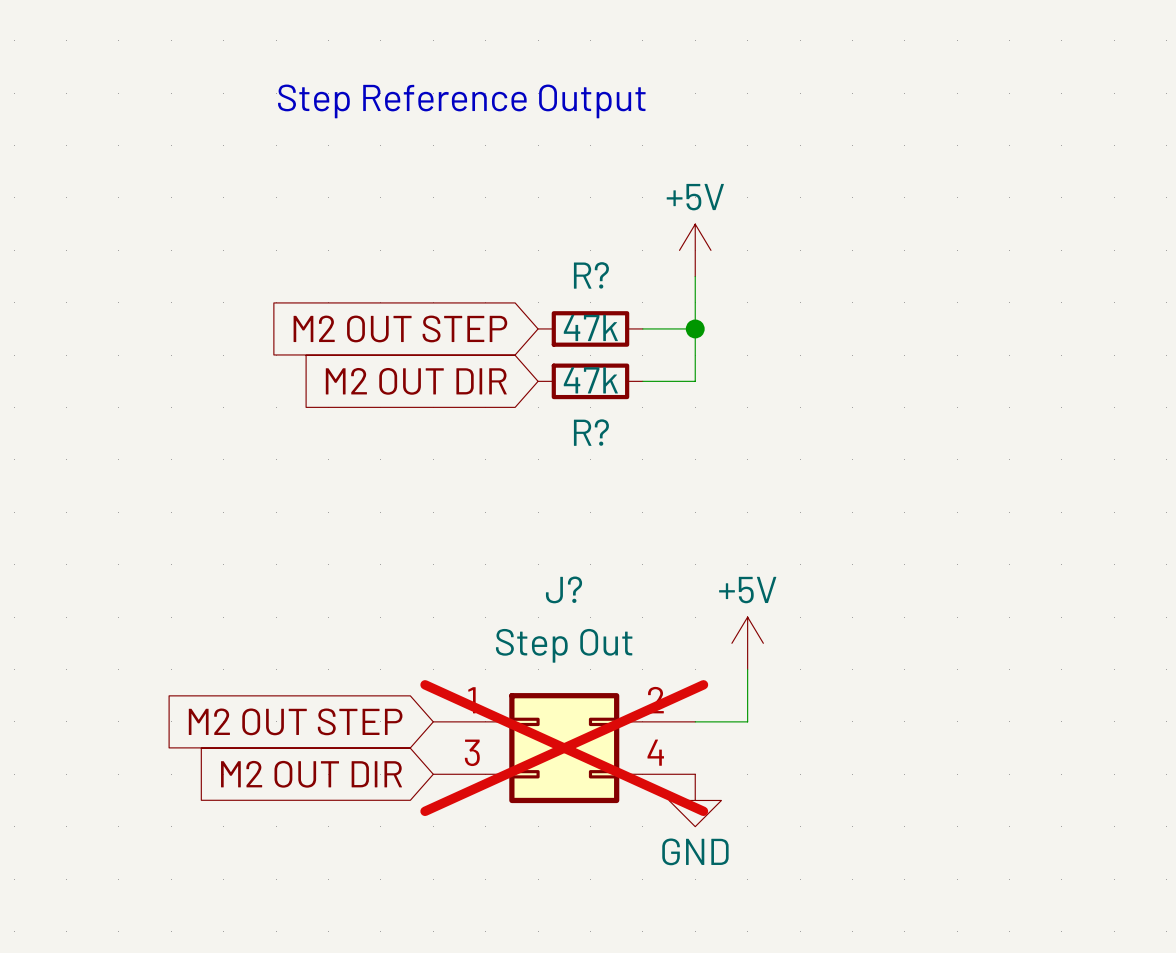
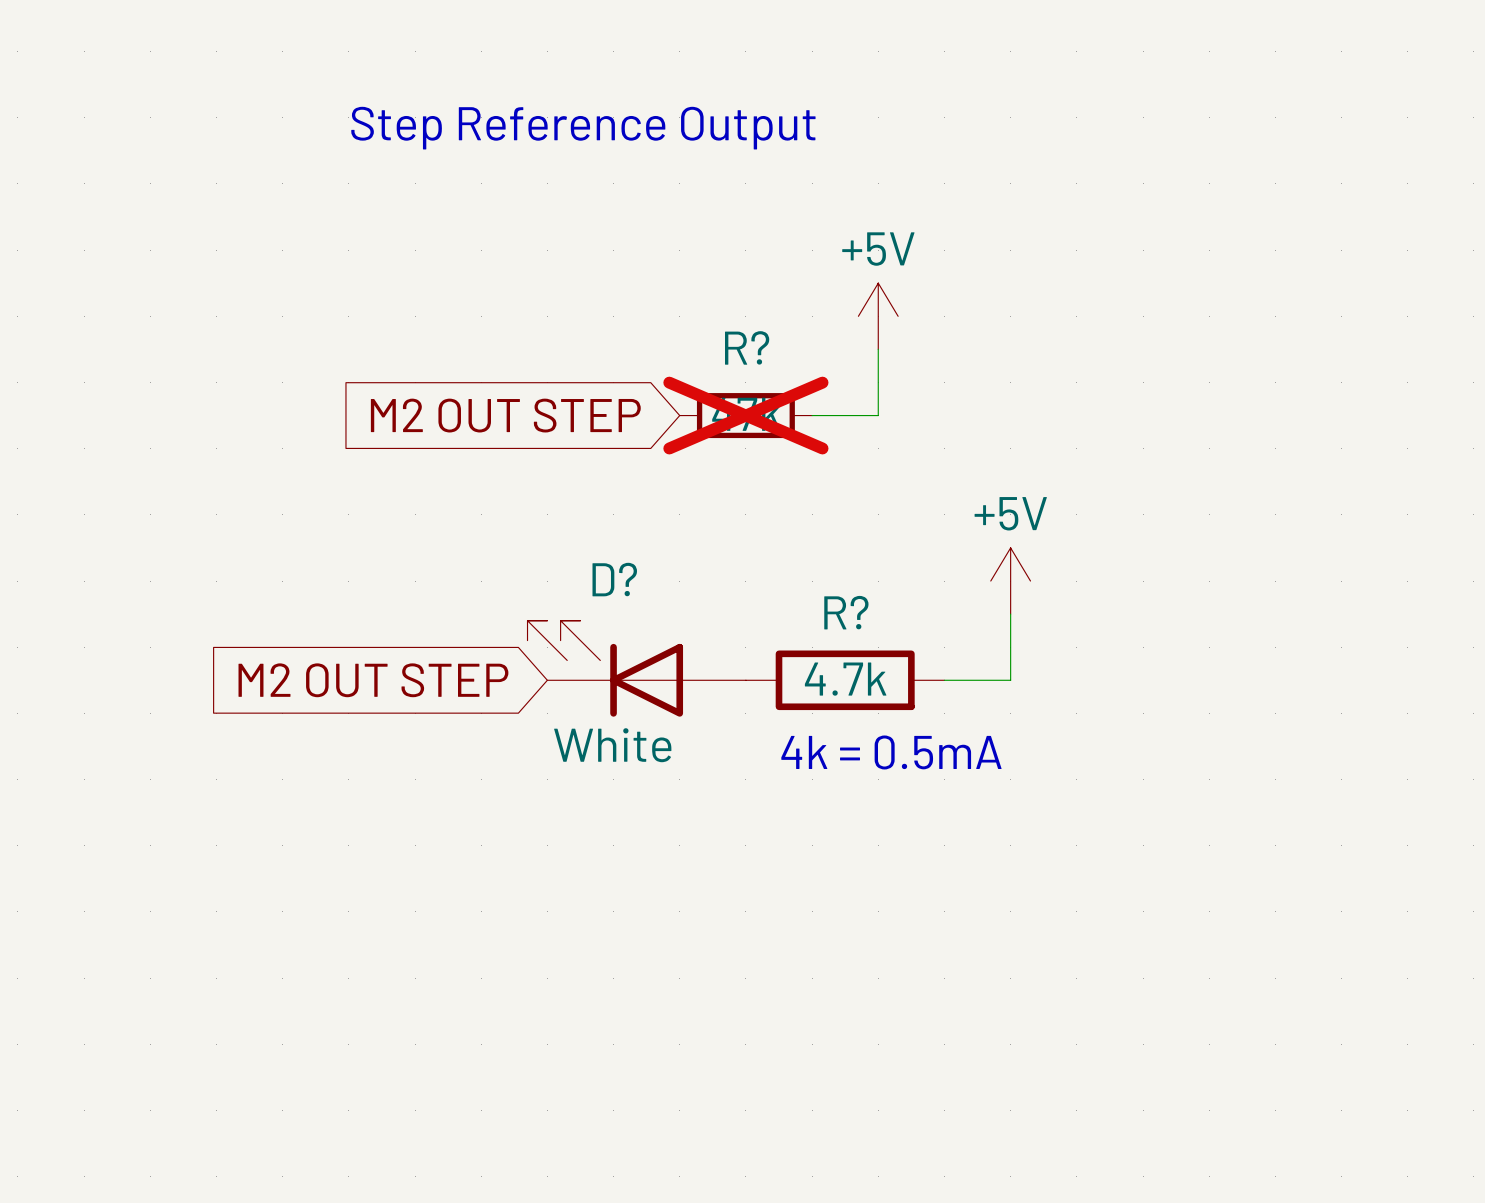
R? do-not-place cross: none -> (745, 415)
wire: (695, 328) (695, 381) (642, 381) -> (1010, 614) (1010, 680) (944, 680)
junction: (695, 328) -> none
global label: M2 OUT DIR (416, 381) -> none
R?: 47k (590, 381) -> none
D?: none -> White (636, 668)
R?: none -> 4.7k (845, 680)
text: none -> 4k = 0.5mA (891, 752)
power symbol position: +5V (747, 643) -> +5V (1010, 581)
wire: (747, 669) (747, 721) (695, 721) -> none
global label position: M2 OUT STEP (295, 721) -> M2 OUT STEP (373, 680)
J?: Step Out (564, 748) -> none
global label: M2 OUT DIR (311, 774) -> none
power symbol: GND (695, 800) -> none

